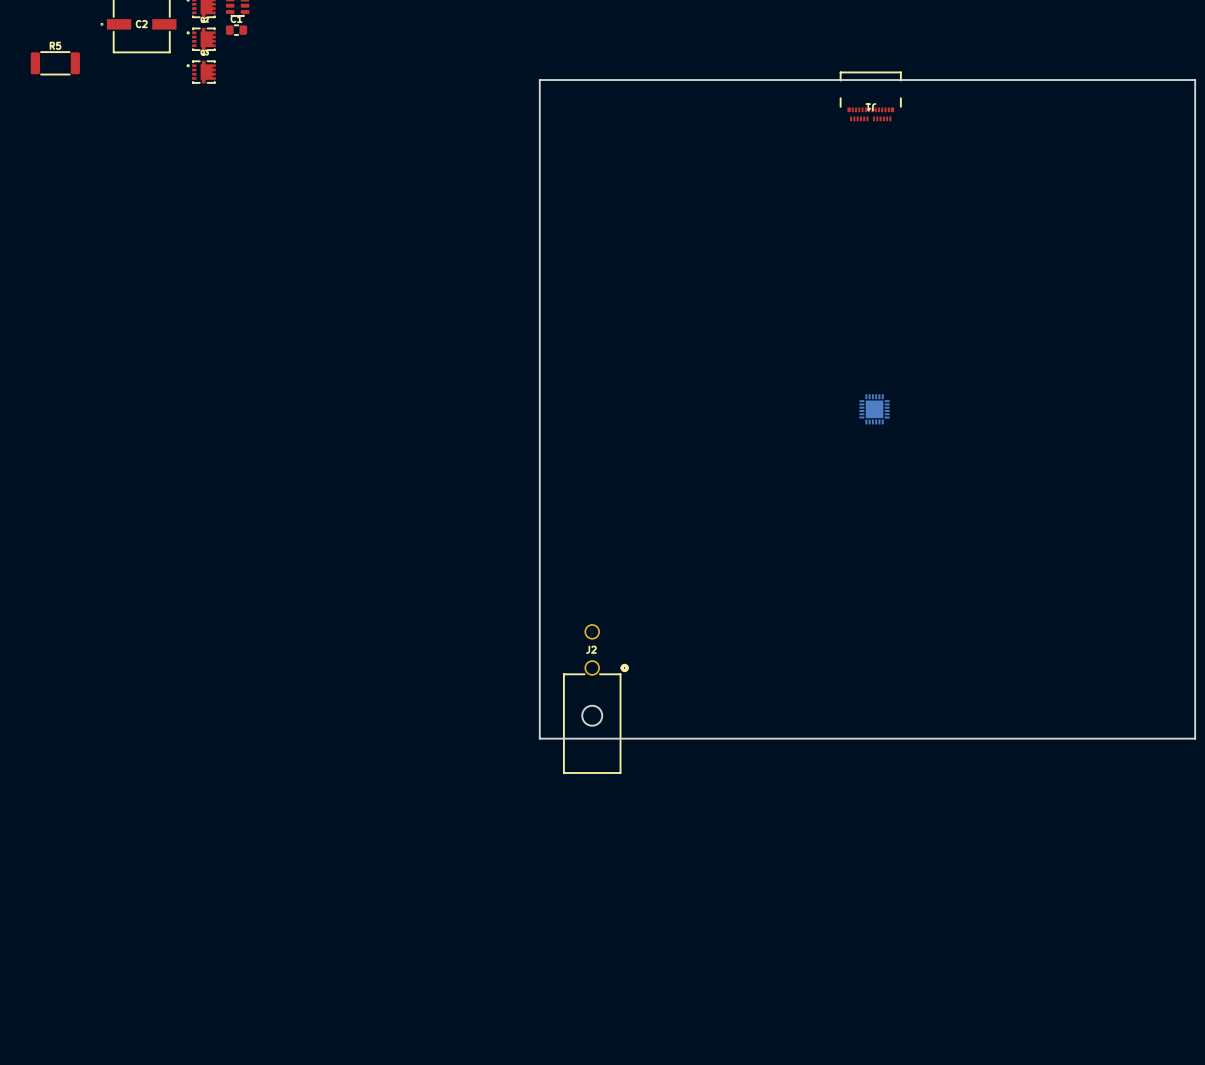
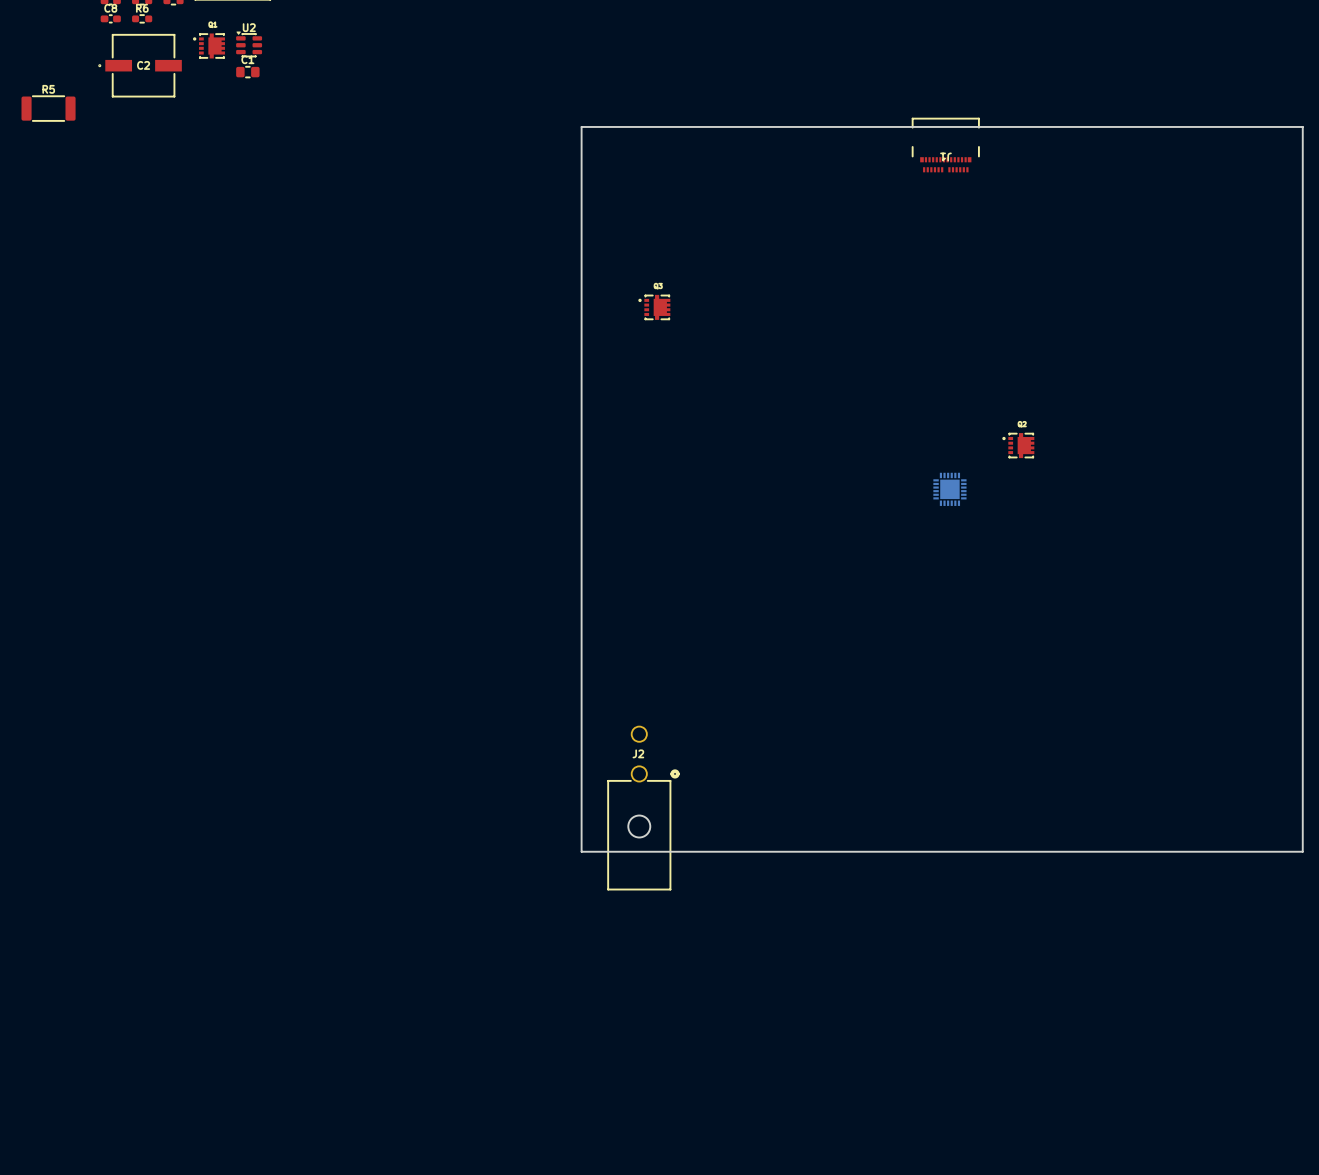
part position: (201, 39) -> (1018, 445)
part position: (201, 72) -> (654, 307)

